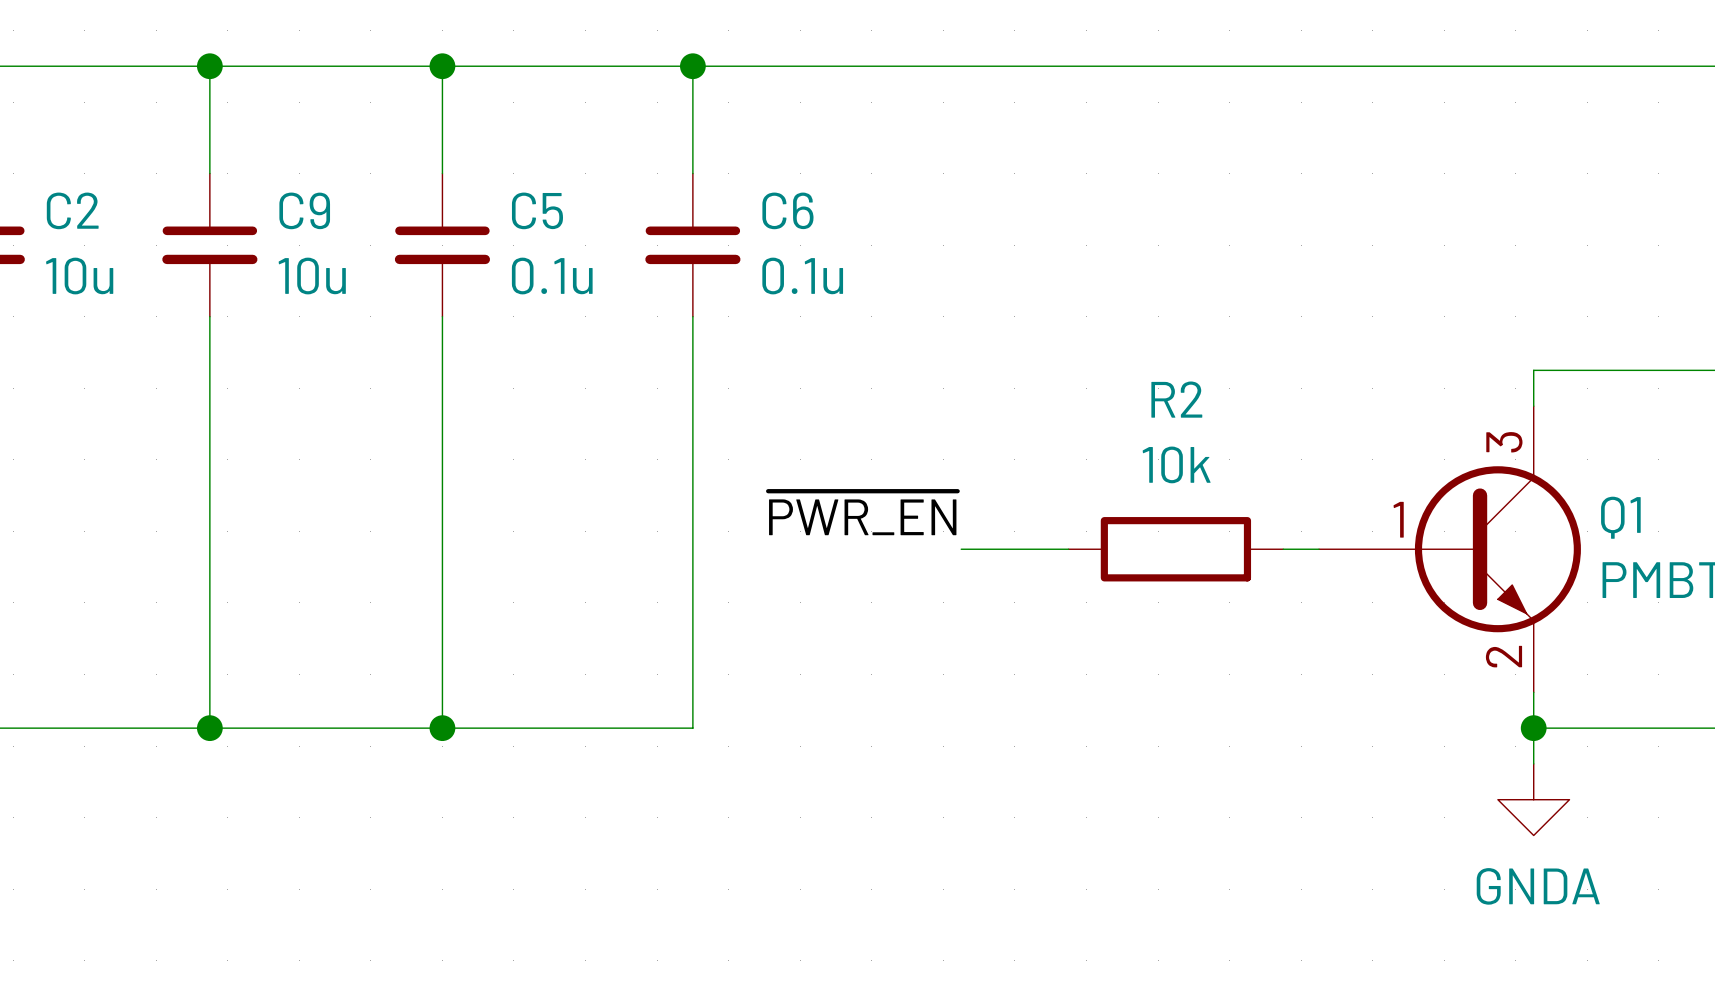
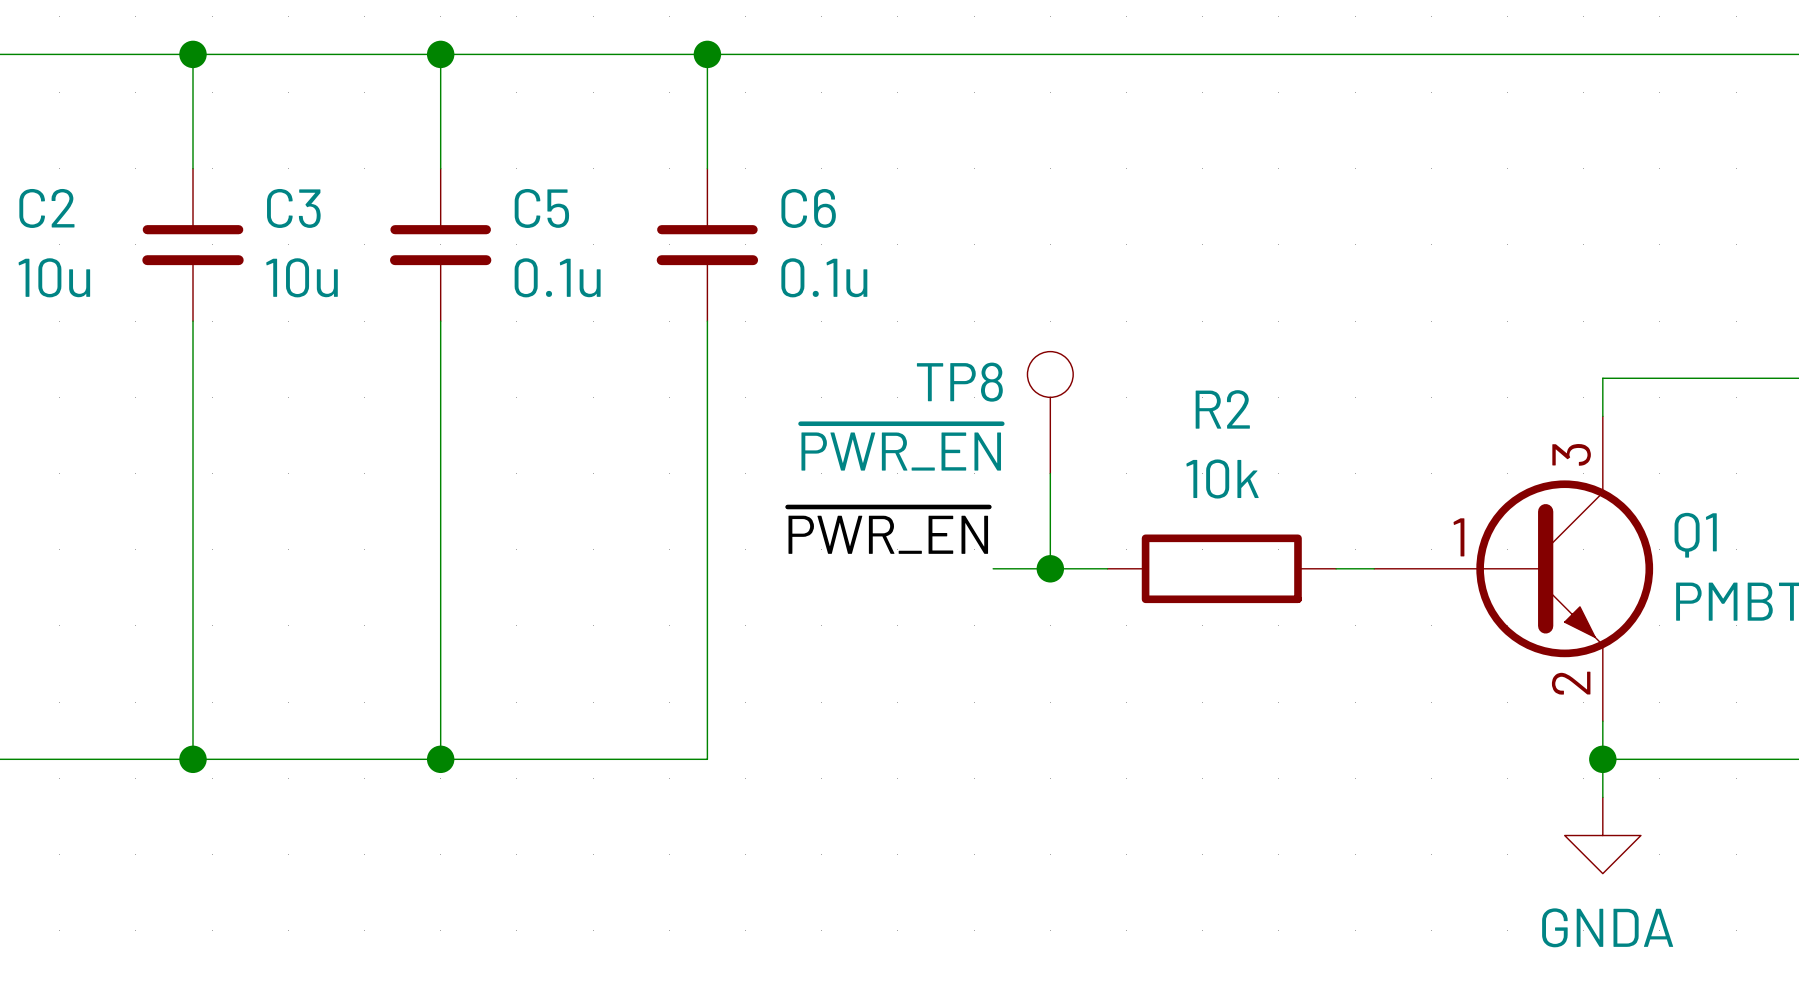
C9 name: C9 (304, 210) -> C3 (293, 208)
TP8: none -> ~{PWR_EN} (1050, 412)
wire: none -> (1050, 473) (1050, 568)
junction: none -> (1050, 568)

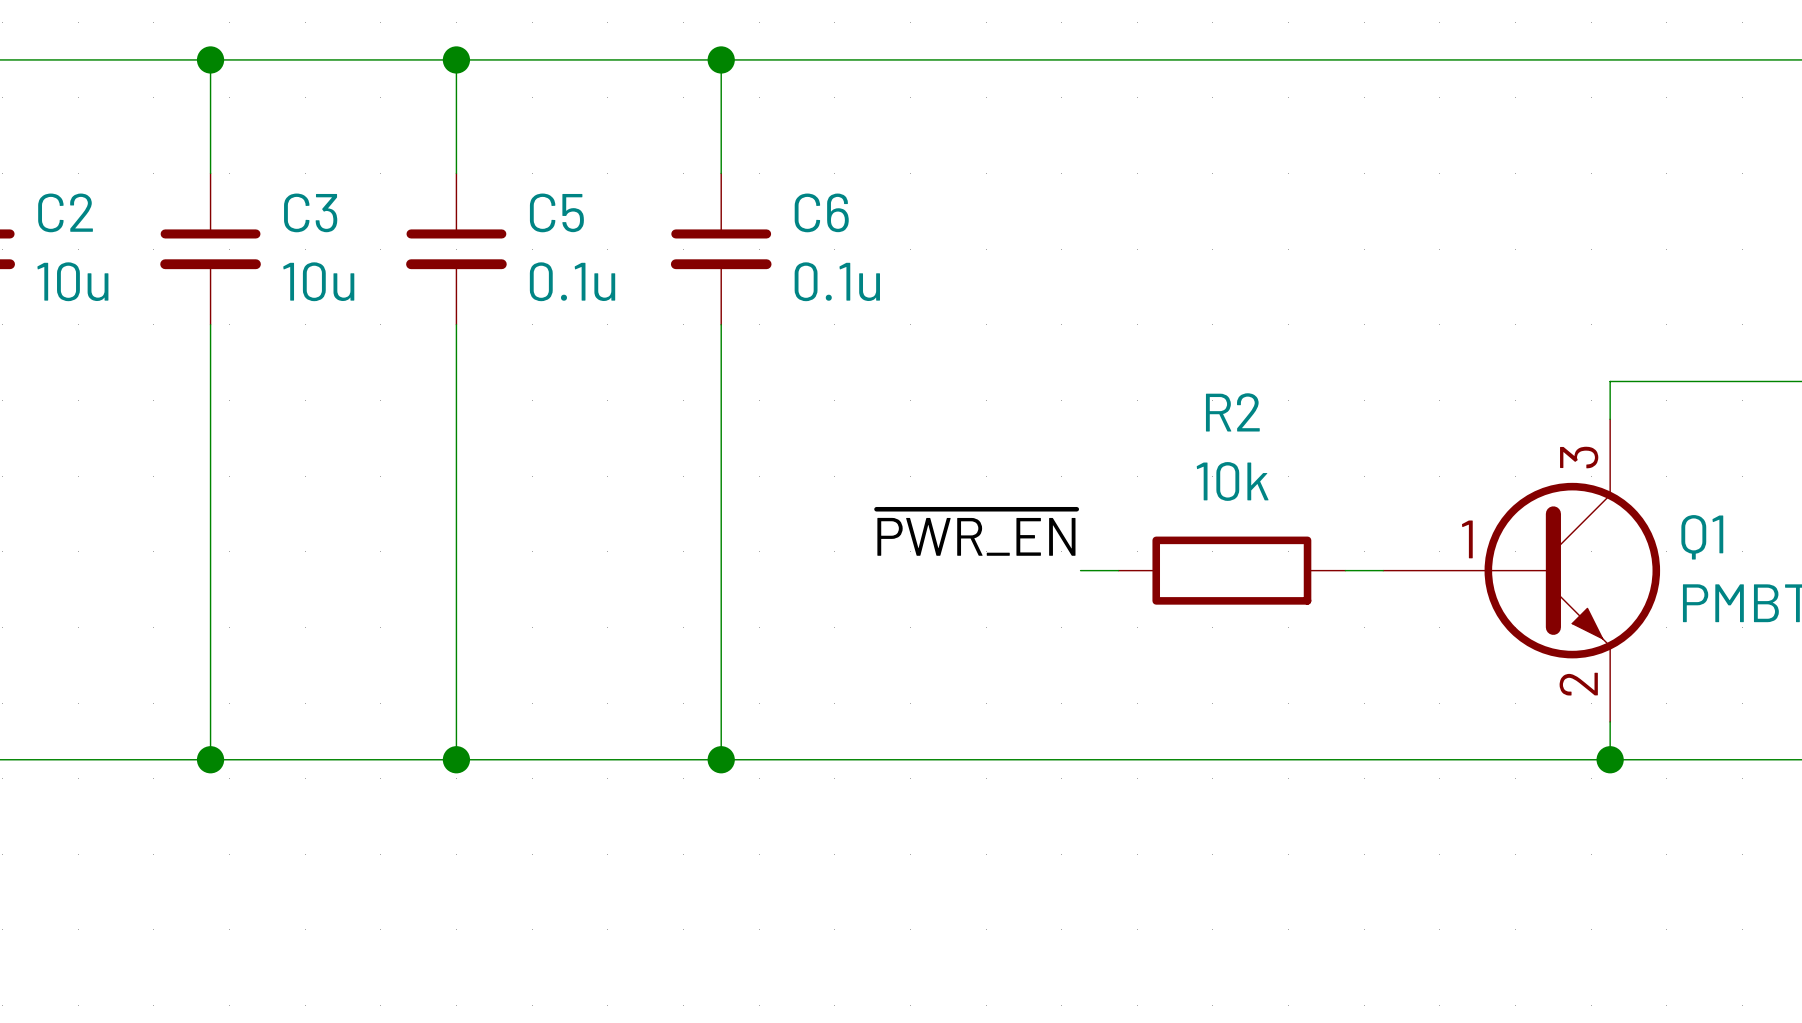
TP8: ~{PWR_EN} (1050, 412) -> none
wire: (1050, 473) (1050, 568) -> none
label position: ~{PWR_EN} (888, 530) -> ~{PWR_EN} (976, 532)
wire: (993, 568) (1069, 568) -> none
junction: (1050, 568) -> none
junction: none -> (721, 759)
wire: (1602, 759) (1602, 797) -> (1610, 759) (721, 759)
power symbol: GNDA (1602, 835) -> none

